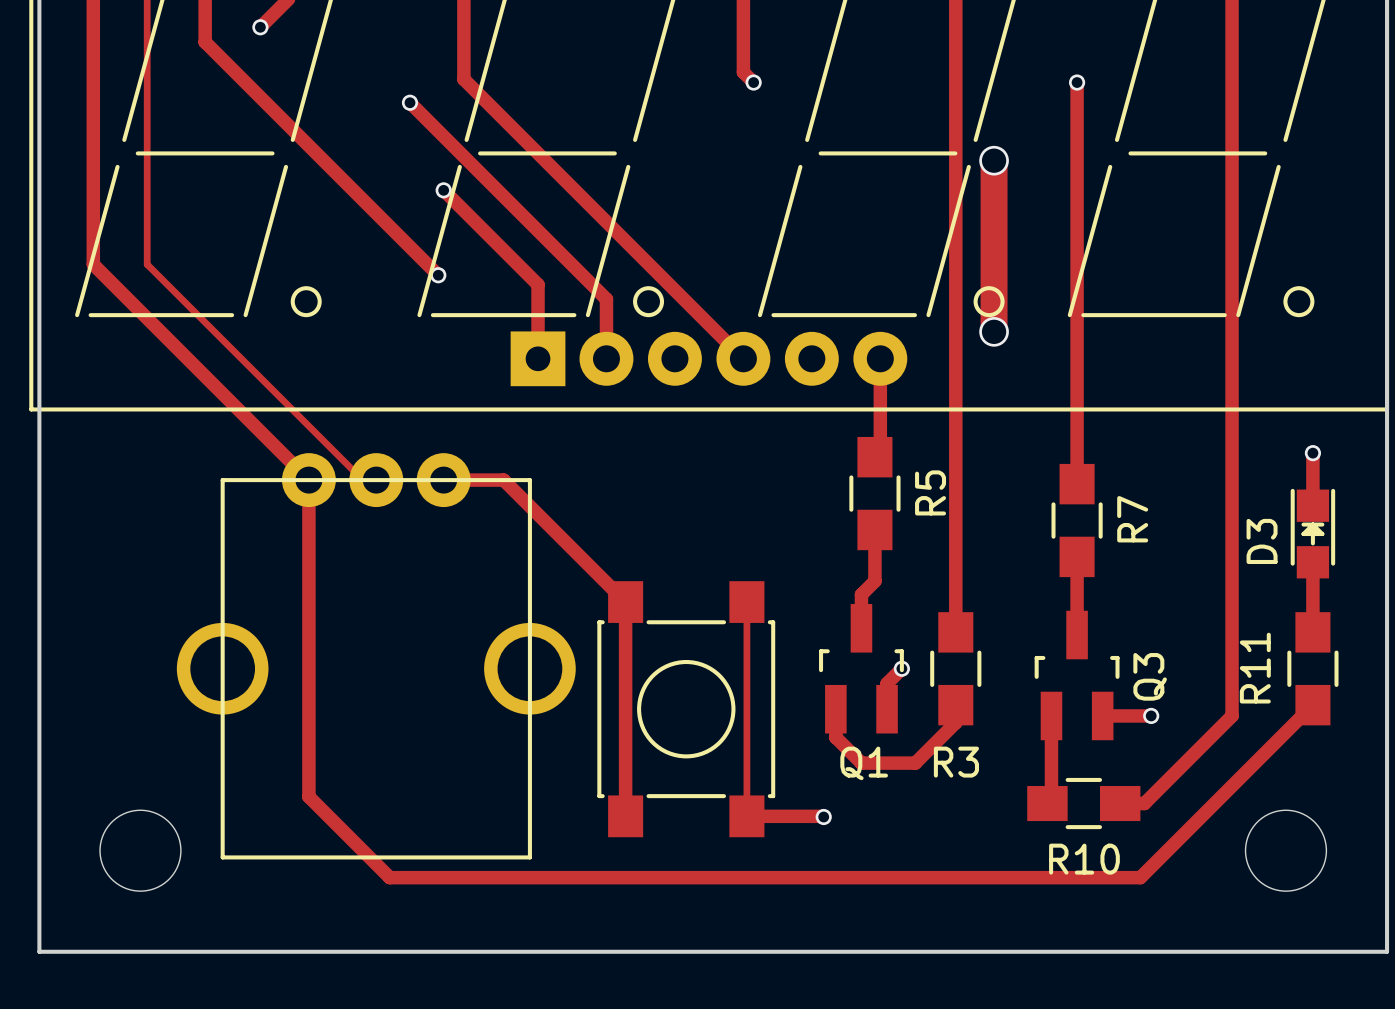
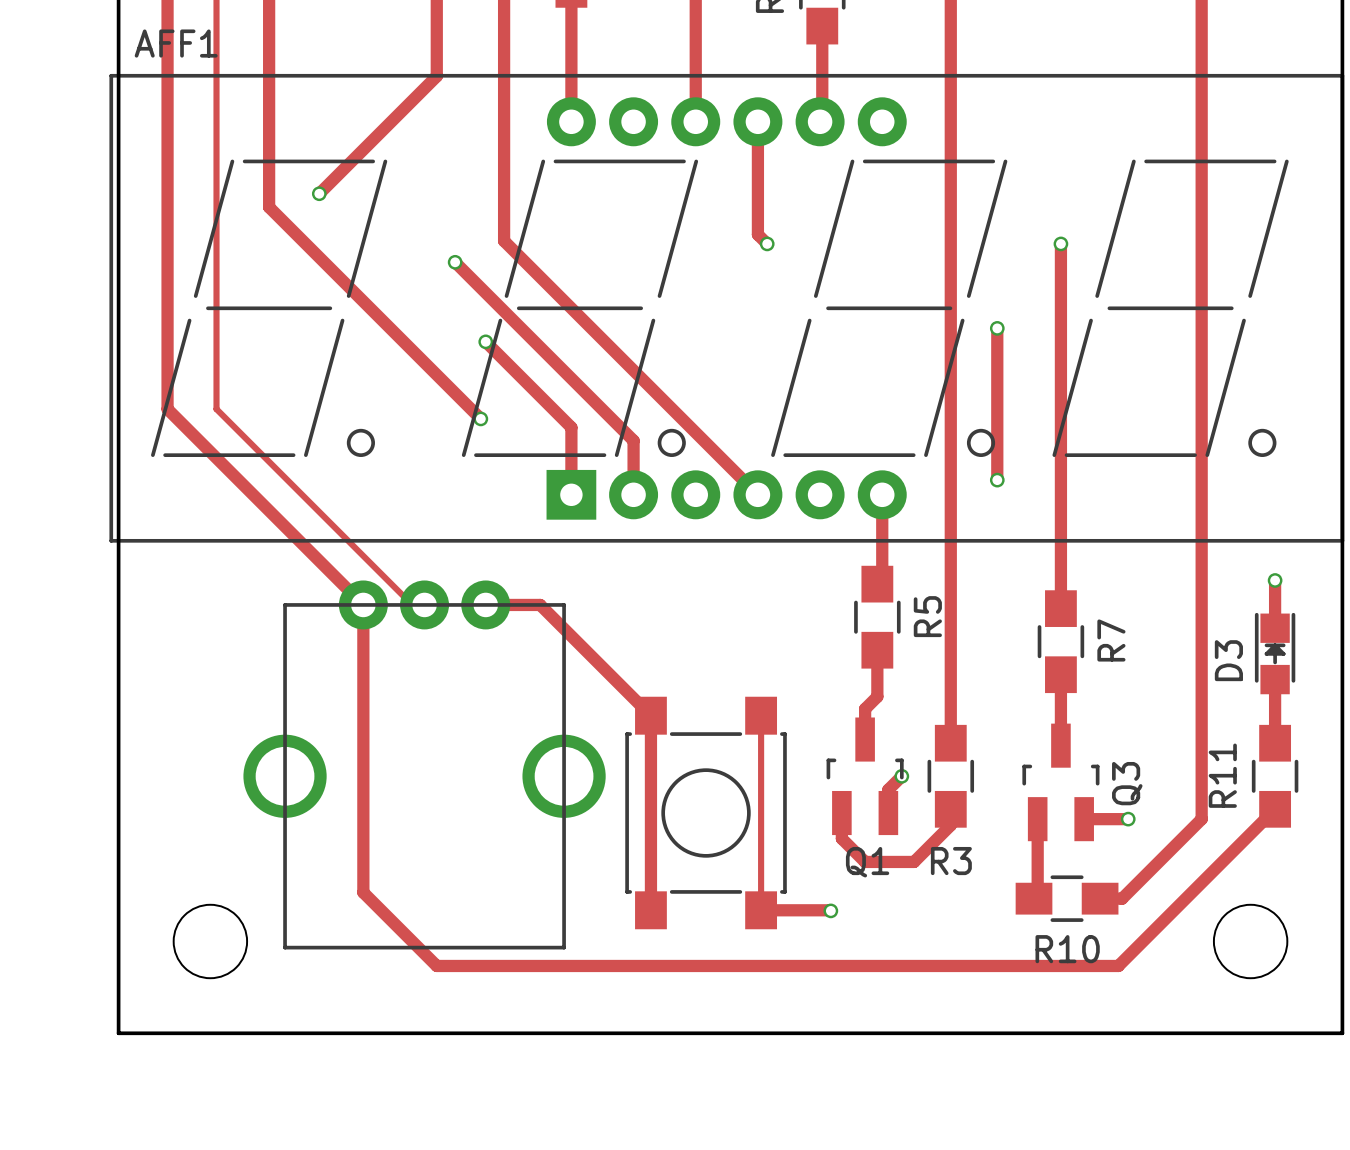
via size: [979, 145, 1009, 176] -> [989, 321, 1005, 336]
track: (994, 160) (994, 331) -> none
track: none -> (997, 328) (997, 480)
via size: [979, 317, 1009, 347] -> [989, 472, 1005, 488]

